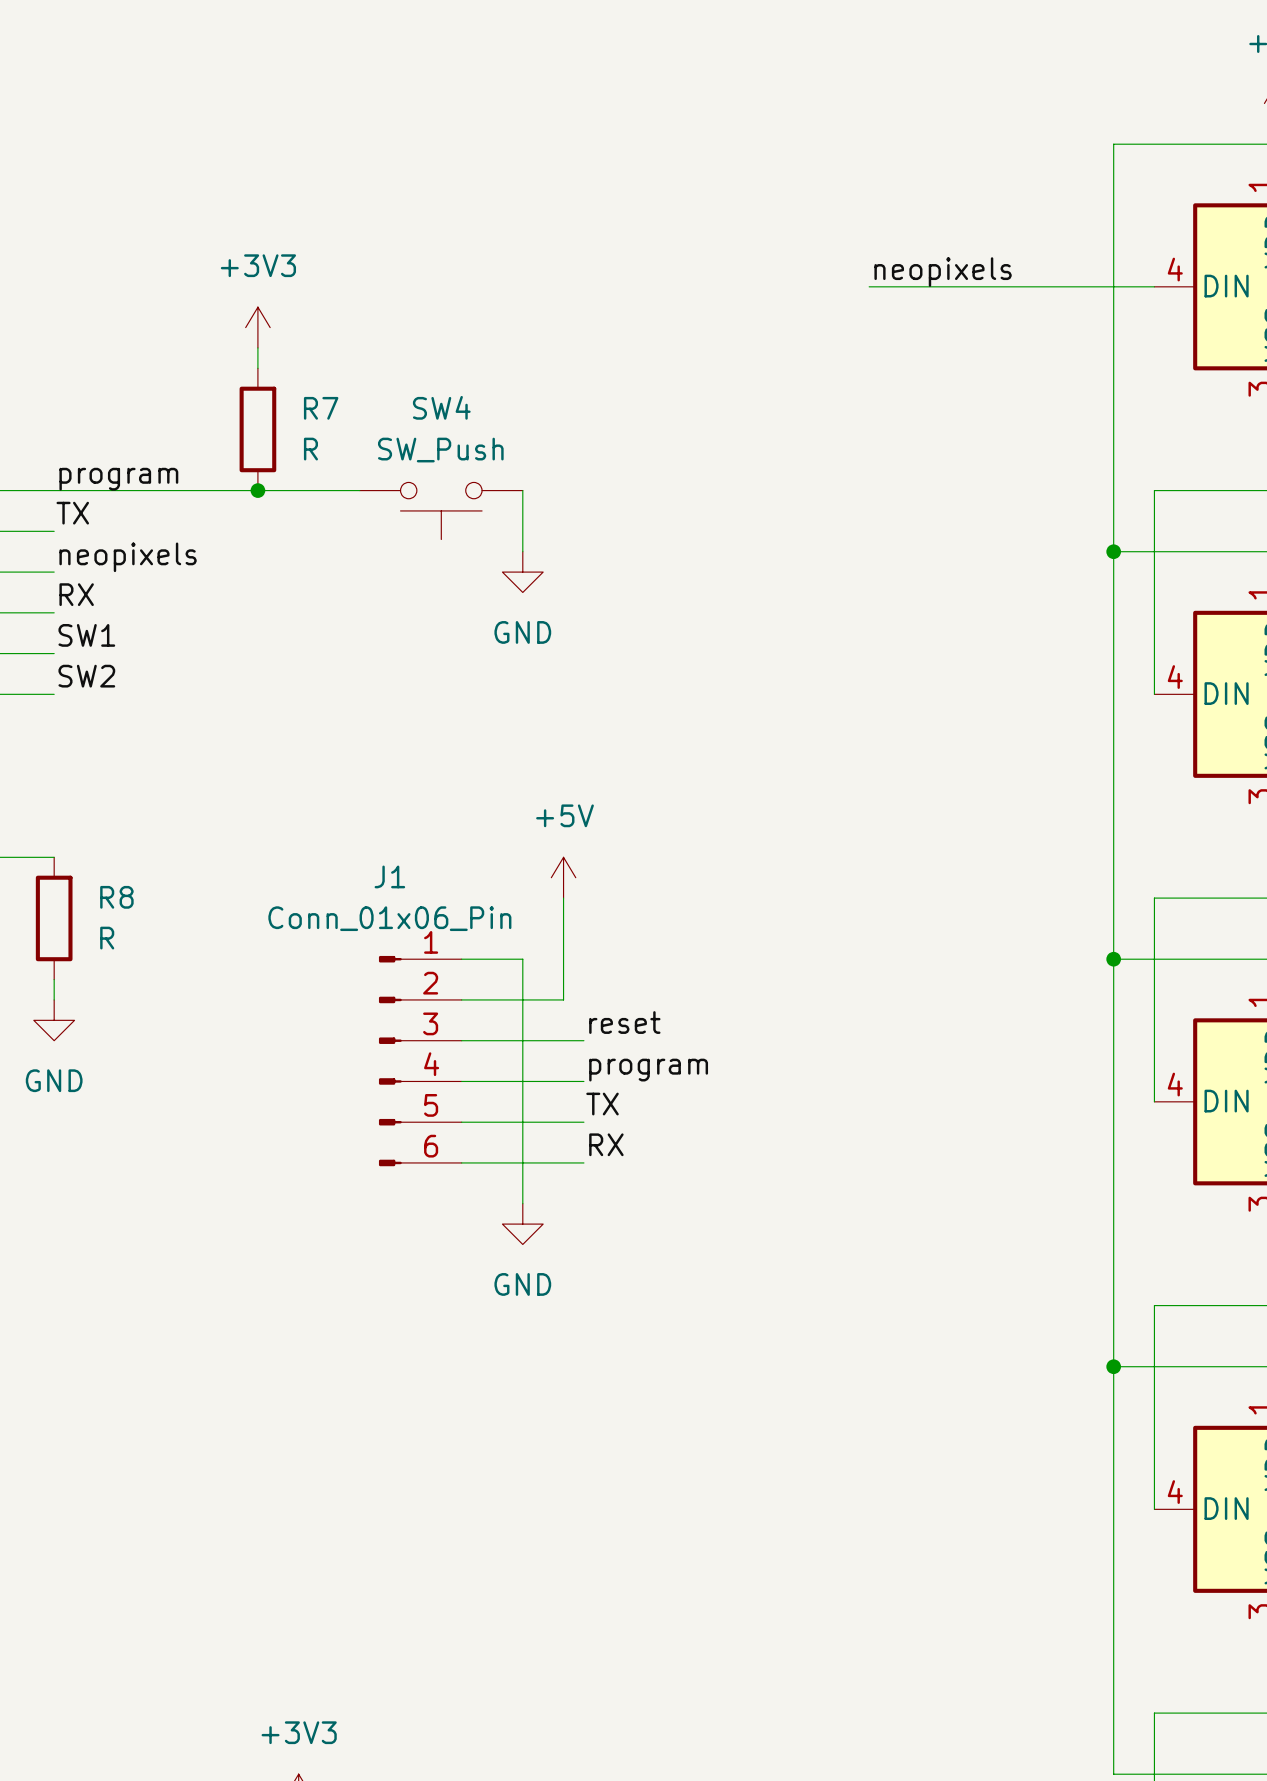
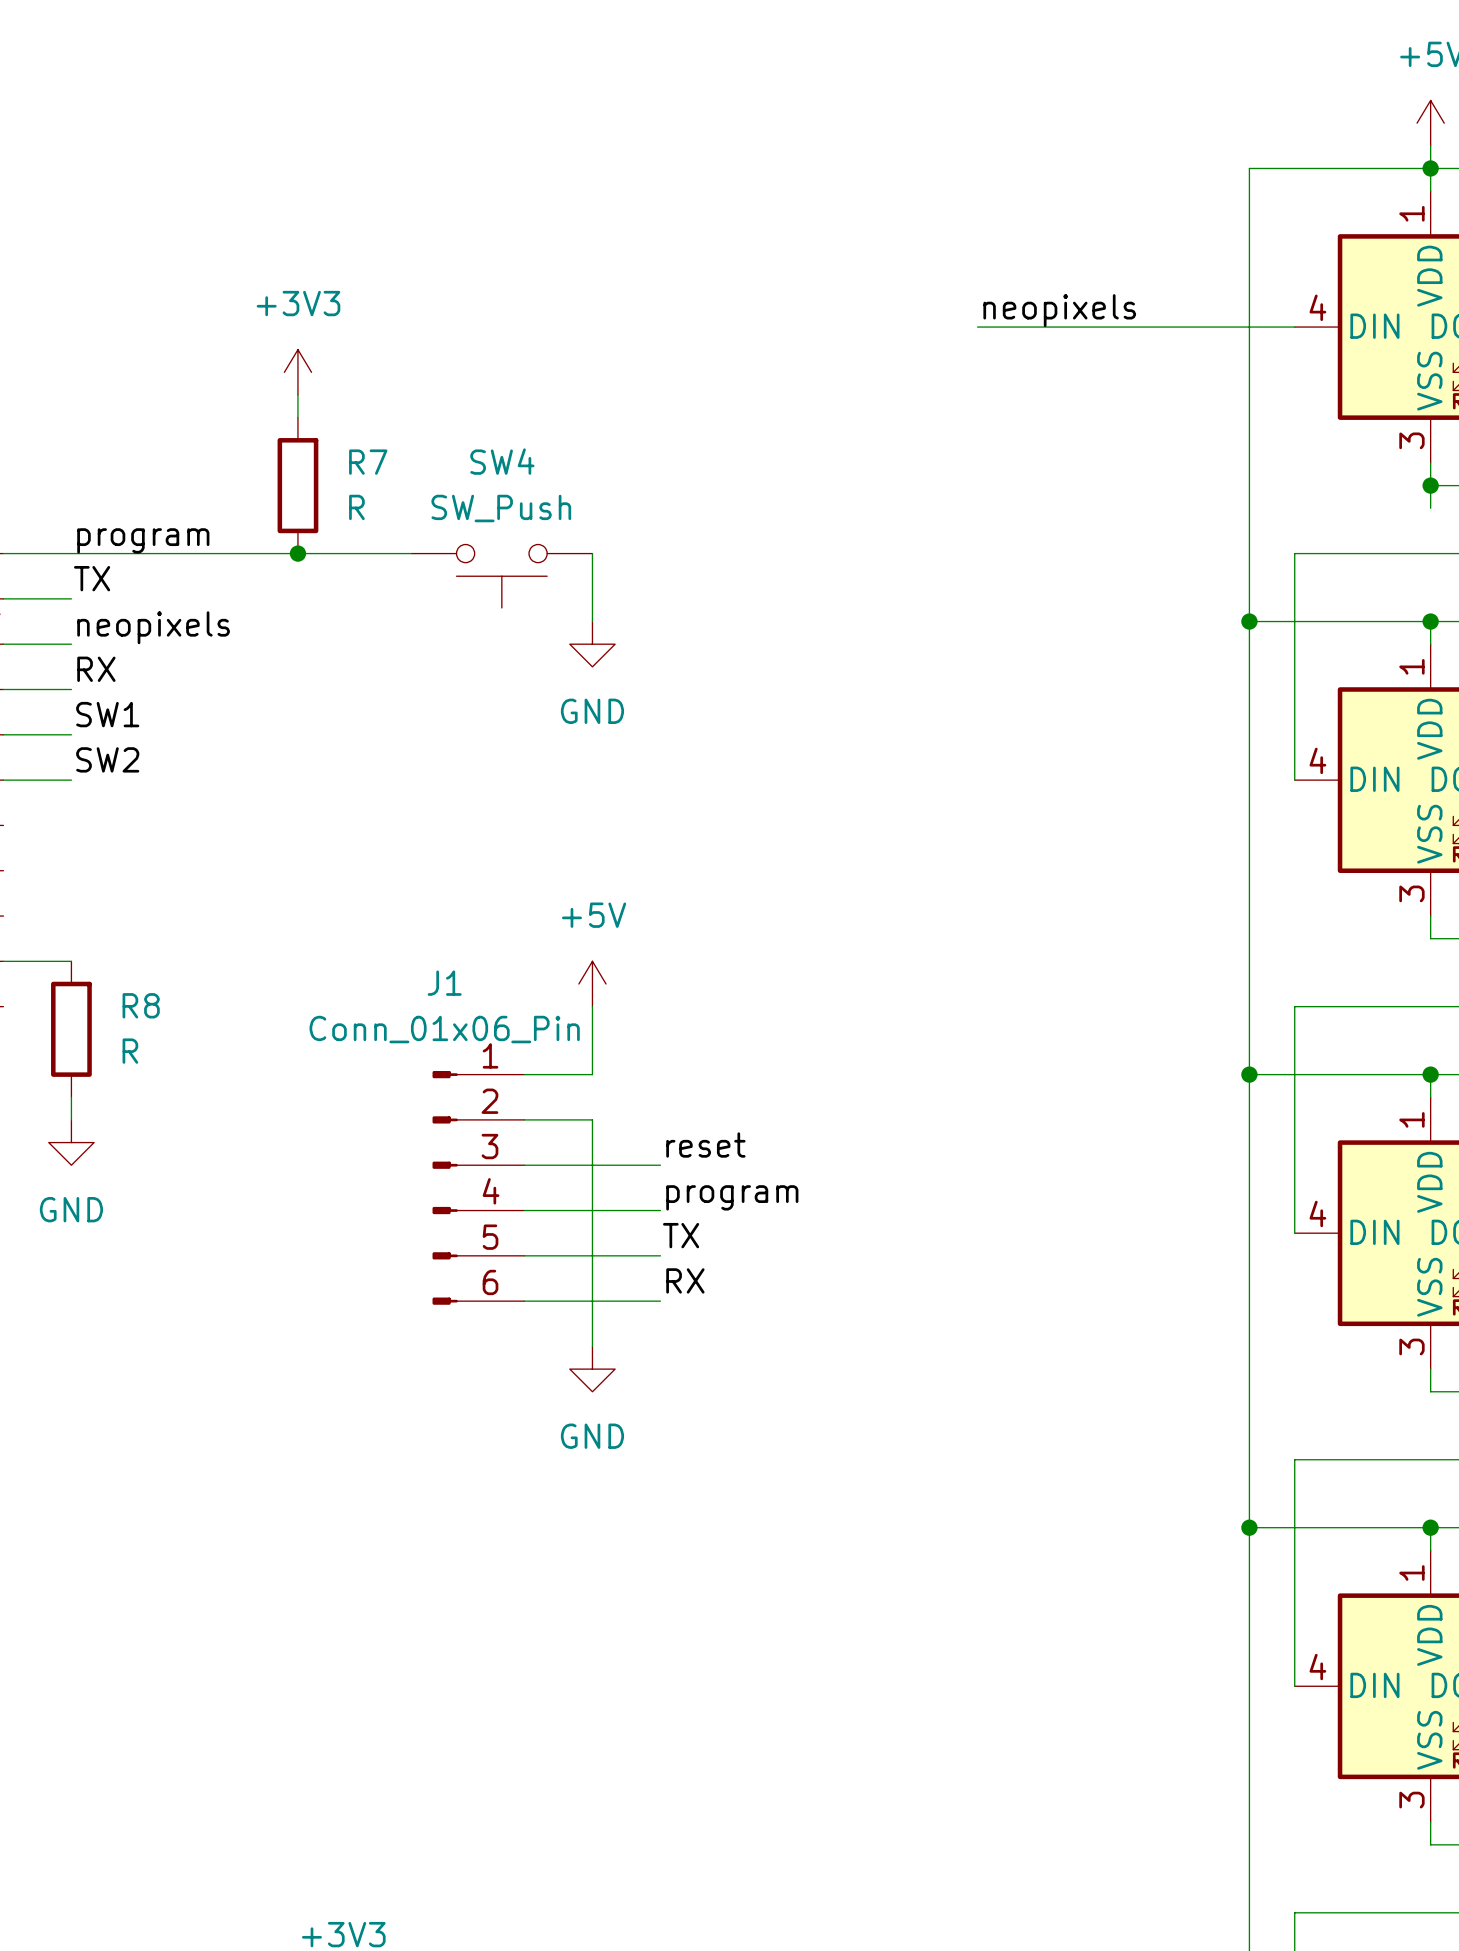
power symbol position: +5V (563, 877) -> +5V (592, 984)
wire: (563, 898) (563, 999) (522, 999) (522, 959) -> (592, 1006) (592, 1074)

